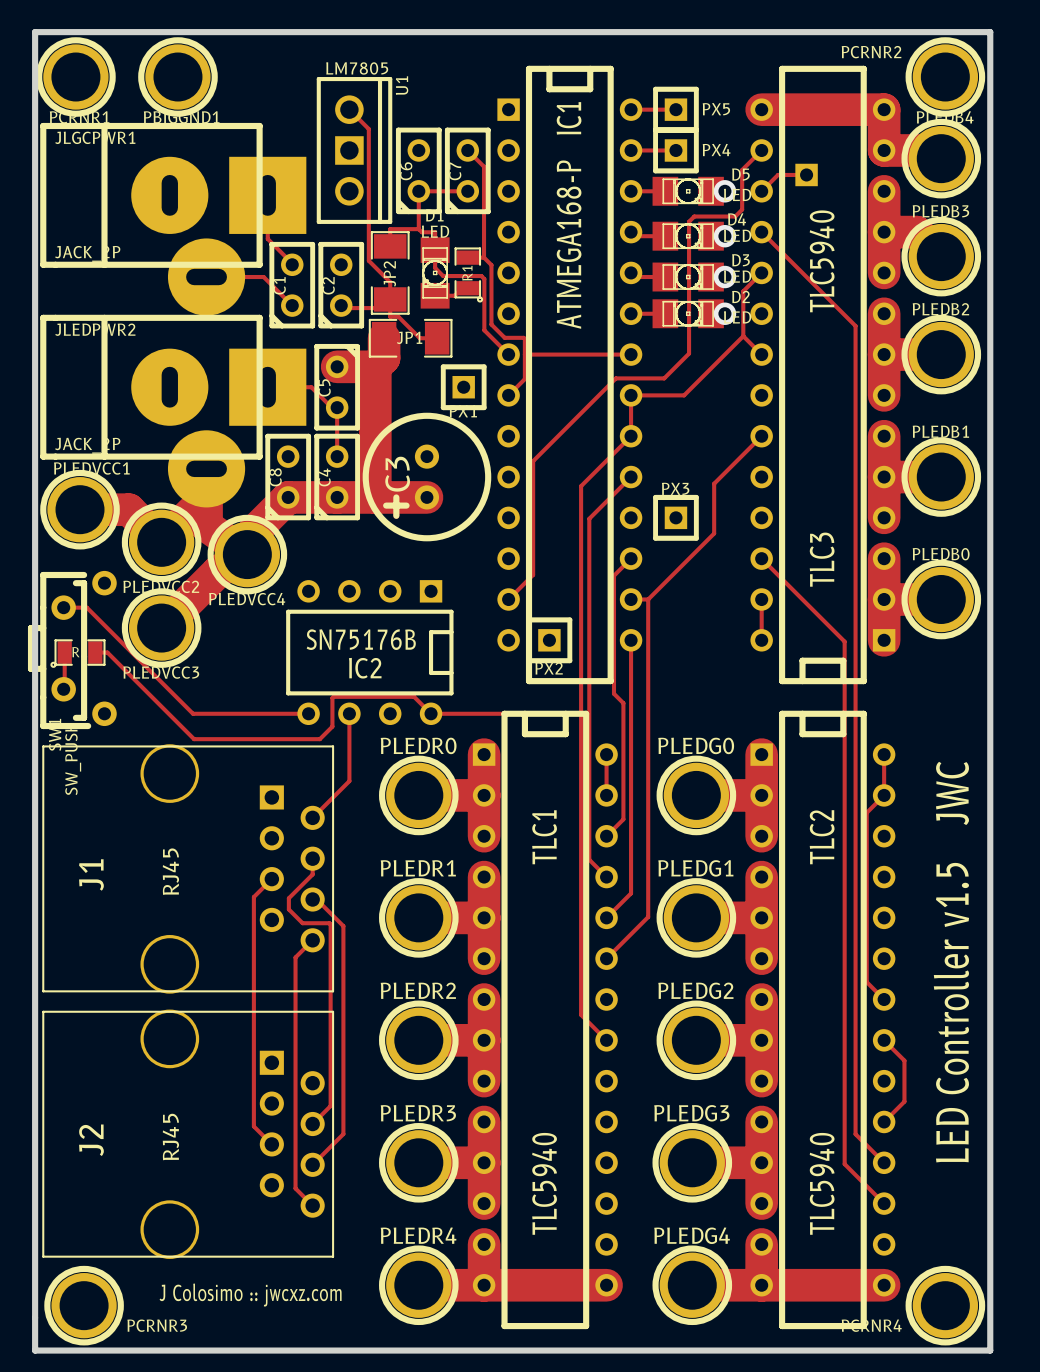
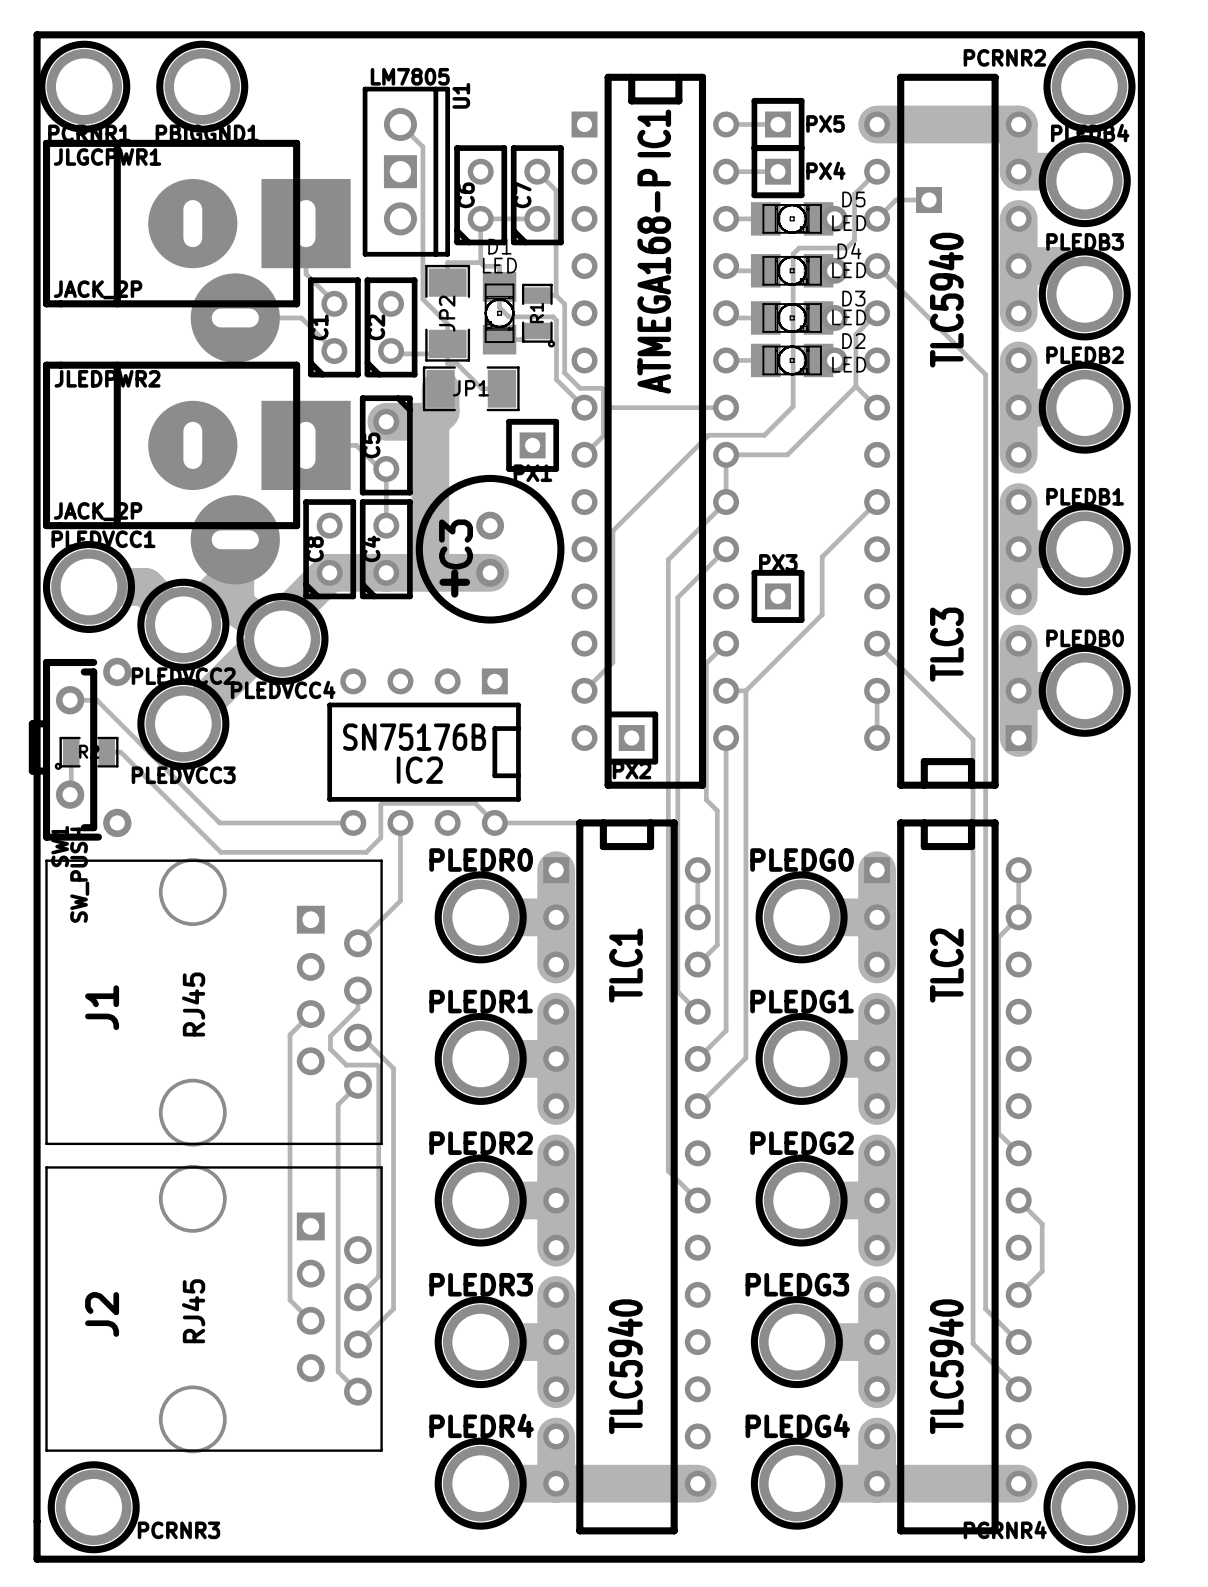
text: LED Controller v1.5 JWC (951, 962) -> none
text: J Colosimo :: jwcxz.com (250, 1295) -> none

